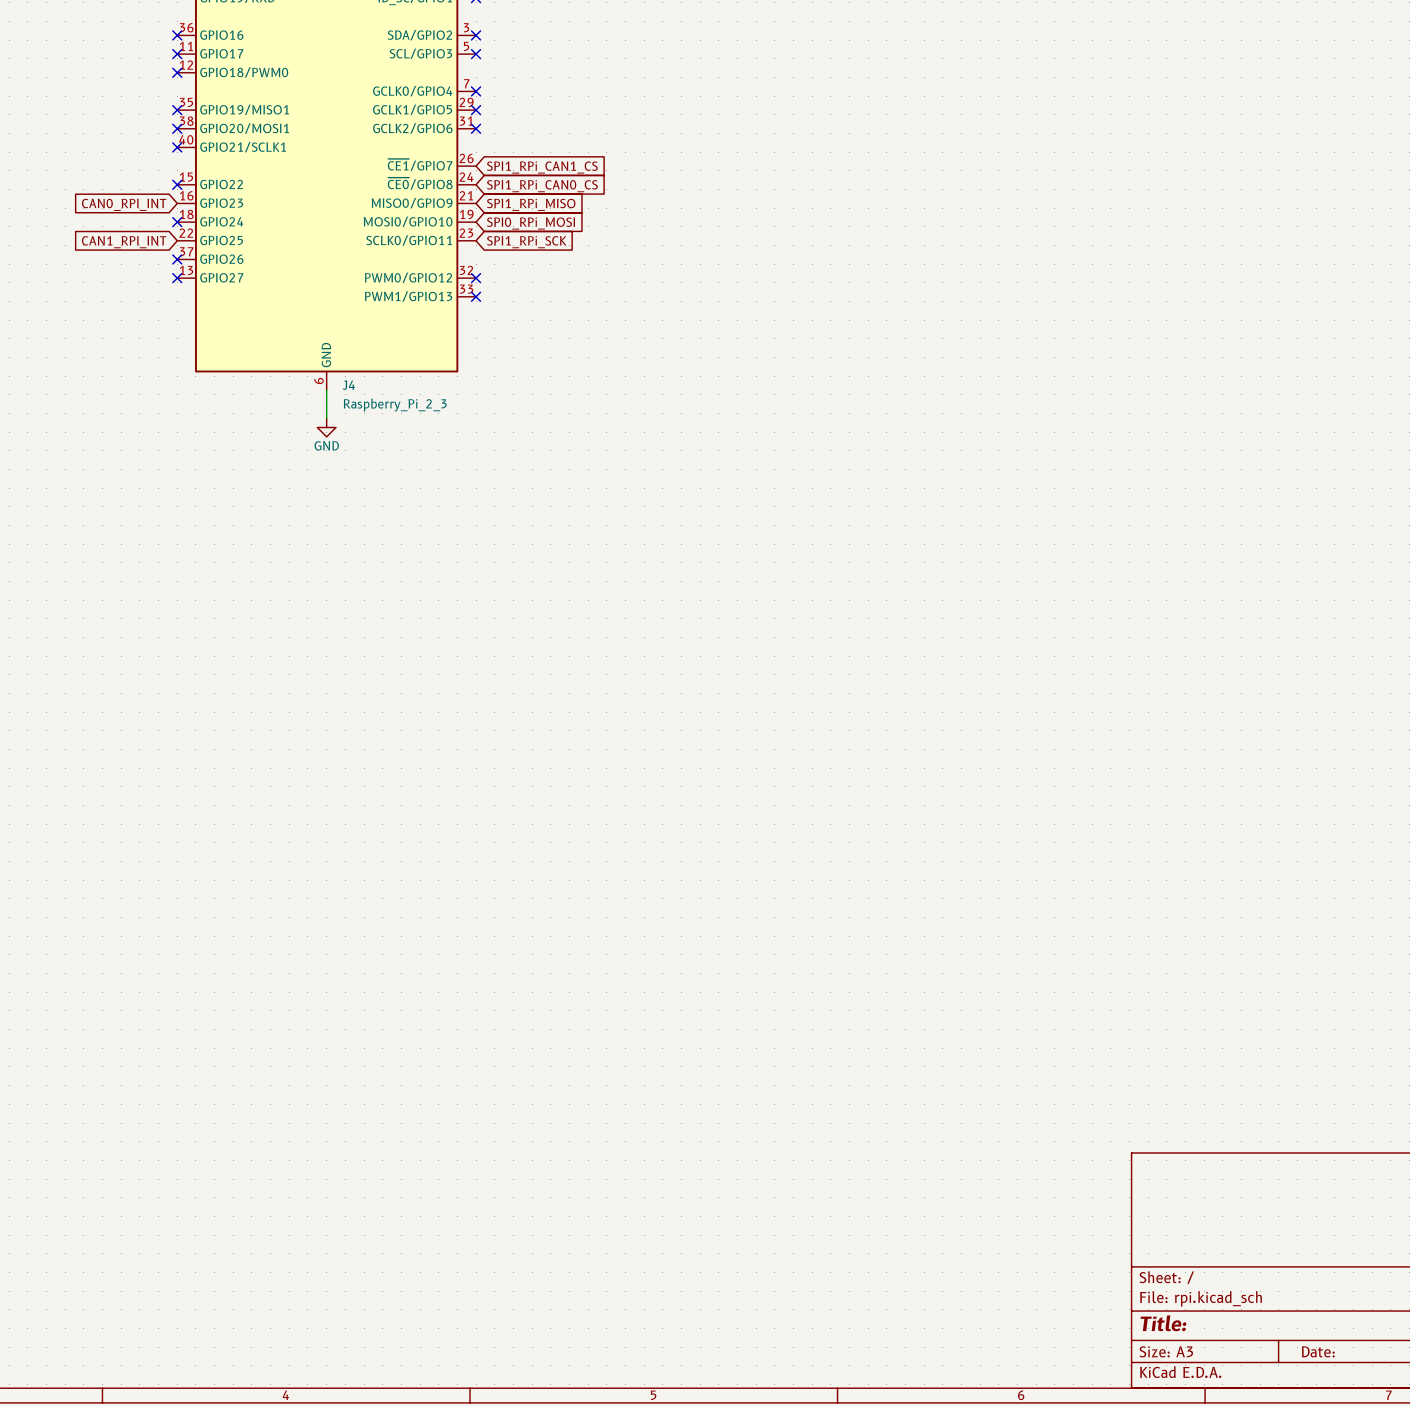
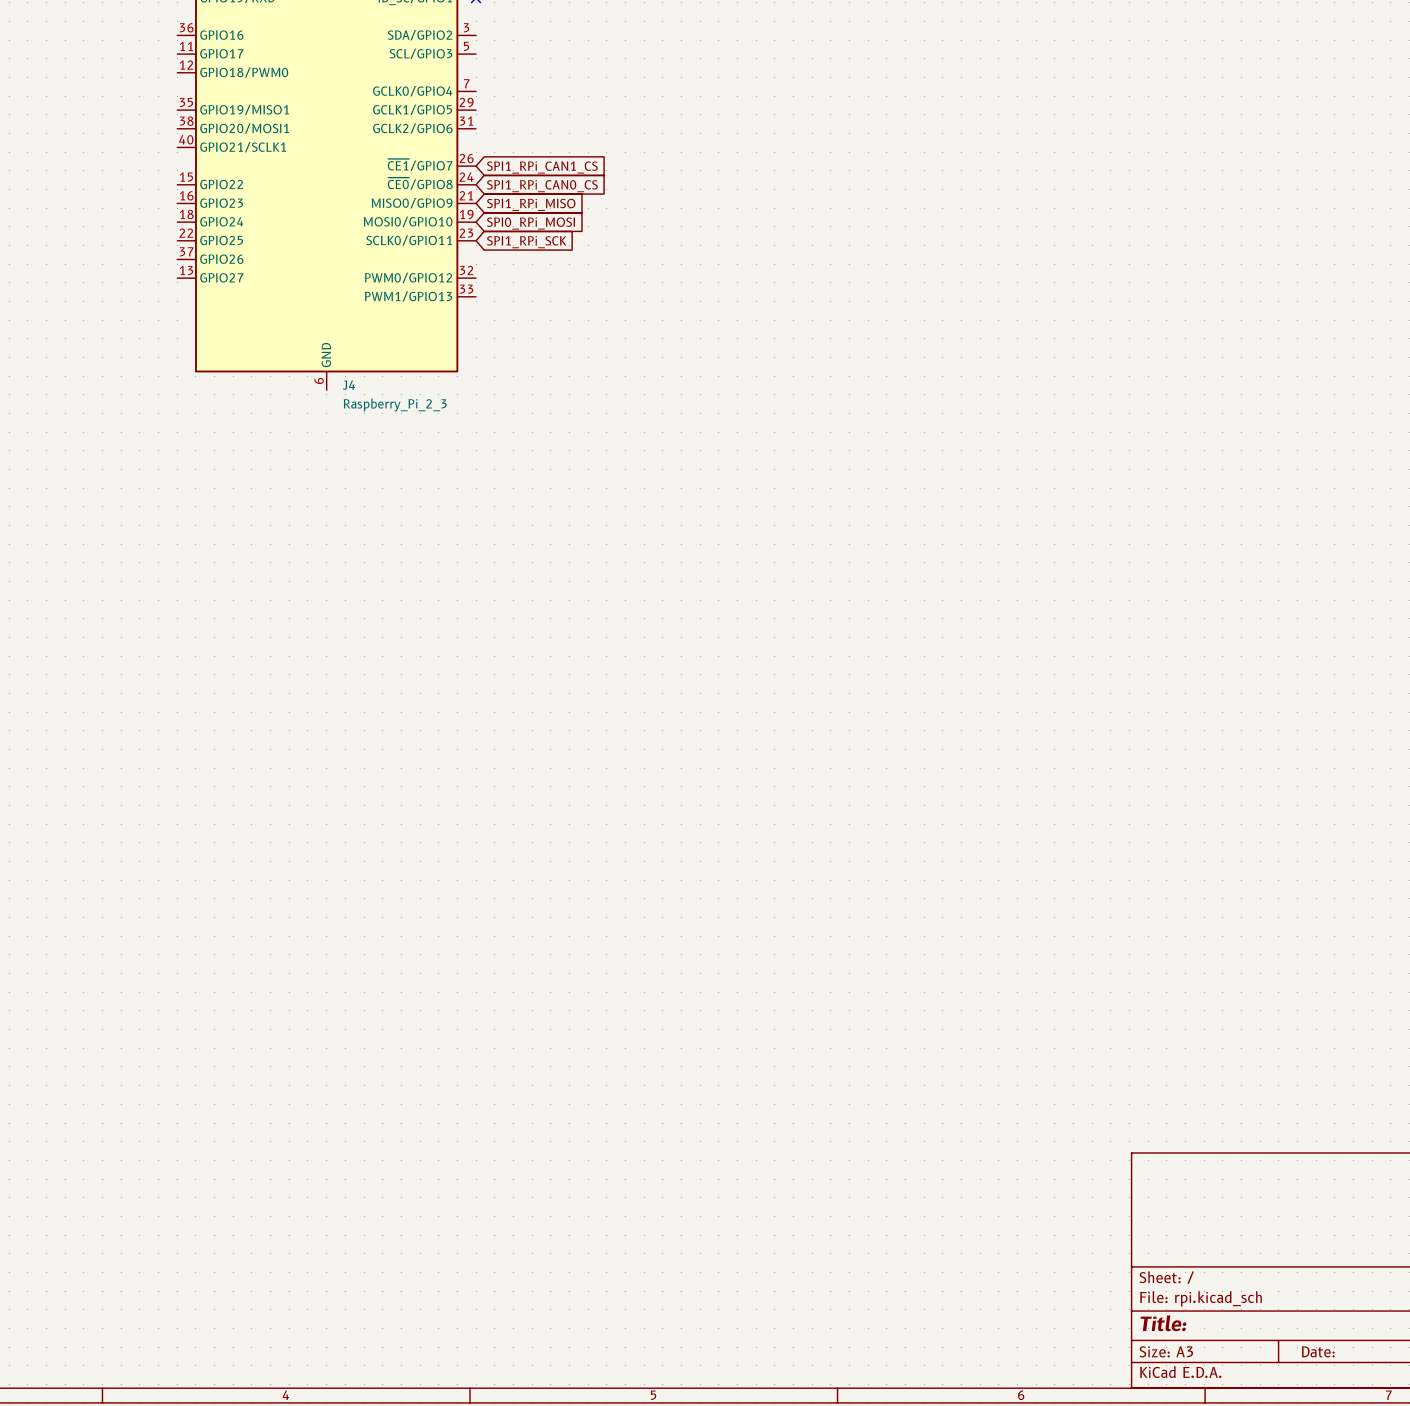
no-connect mark: (177, 35) -> none
no-connect mark: (476, 35) -> none
no-connect mark: (177, 54) -> none
no-connect mark: (476, 54) -> none
no-connect mark: (177, 72) -> none
no-connect mark: (476, 91) -> none
no-connect mark: (177, 110) -> none
no-connect mark: (476, 110) -> none
no-connect mark: (177, 128) -> none
no-connect mark: (476, 128) -> none
no-connect mark: (177, 147) -> none
no-connect mark: (177, 184) -> none
global label: CAN0_RPI_INT (124, 204) -> none
no-connect mark: (177, 222) -> none
global label: CAN1_RPI_INT (124, 242) -> none
no-connect mark: (177, 259) -> none
no-connect mark: (177, 278) -> none
no-connect mark: (476, 278) -> none
no-connect mark: (476, 296) -> none
wire: (326, 390) (326, 418) -> none
power symbol: GND (326, 427) -> none

